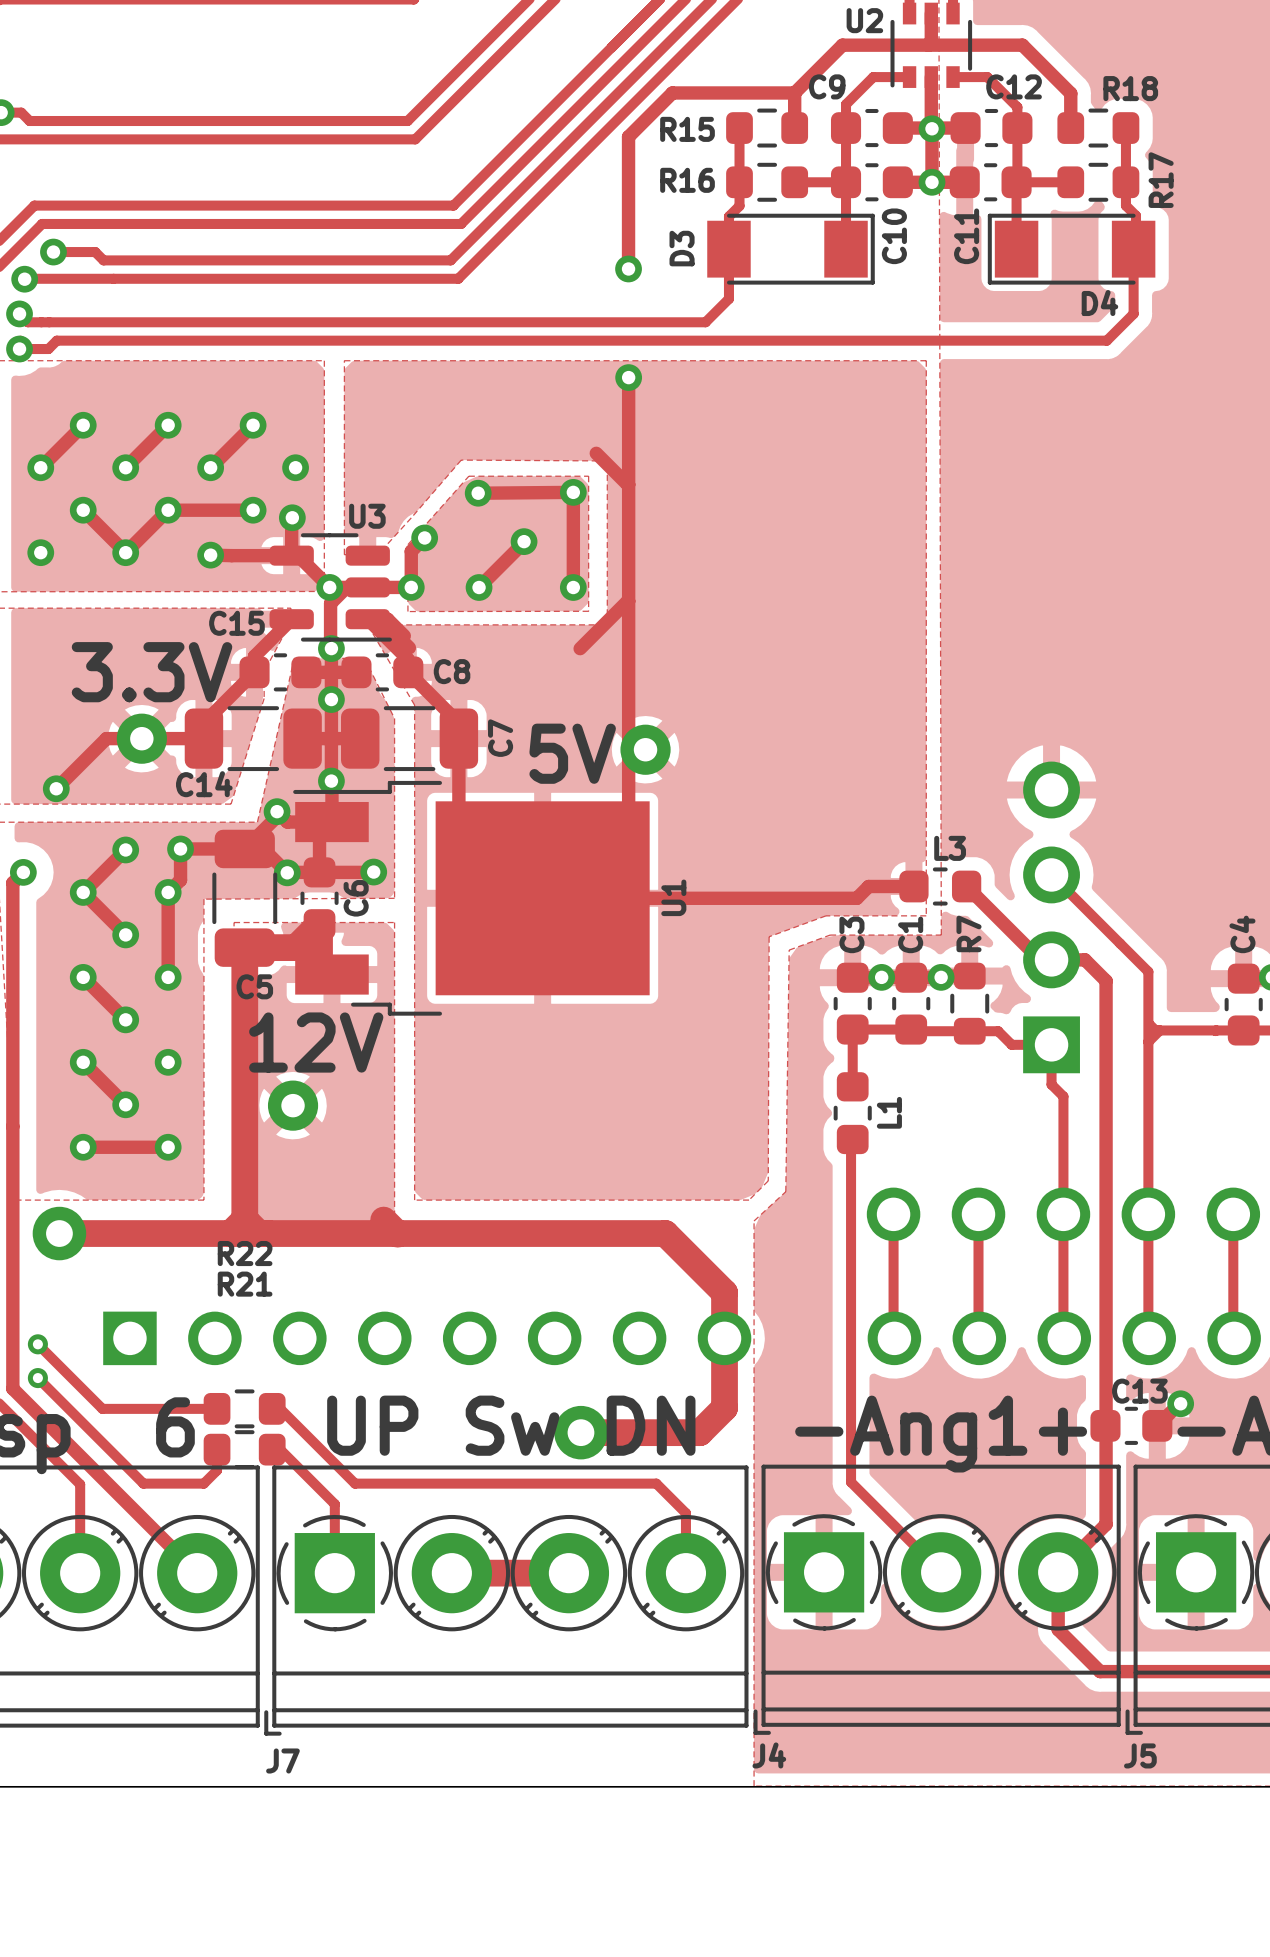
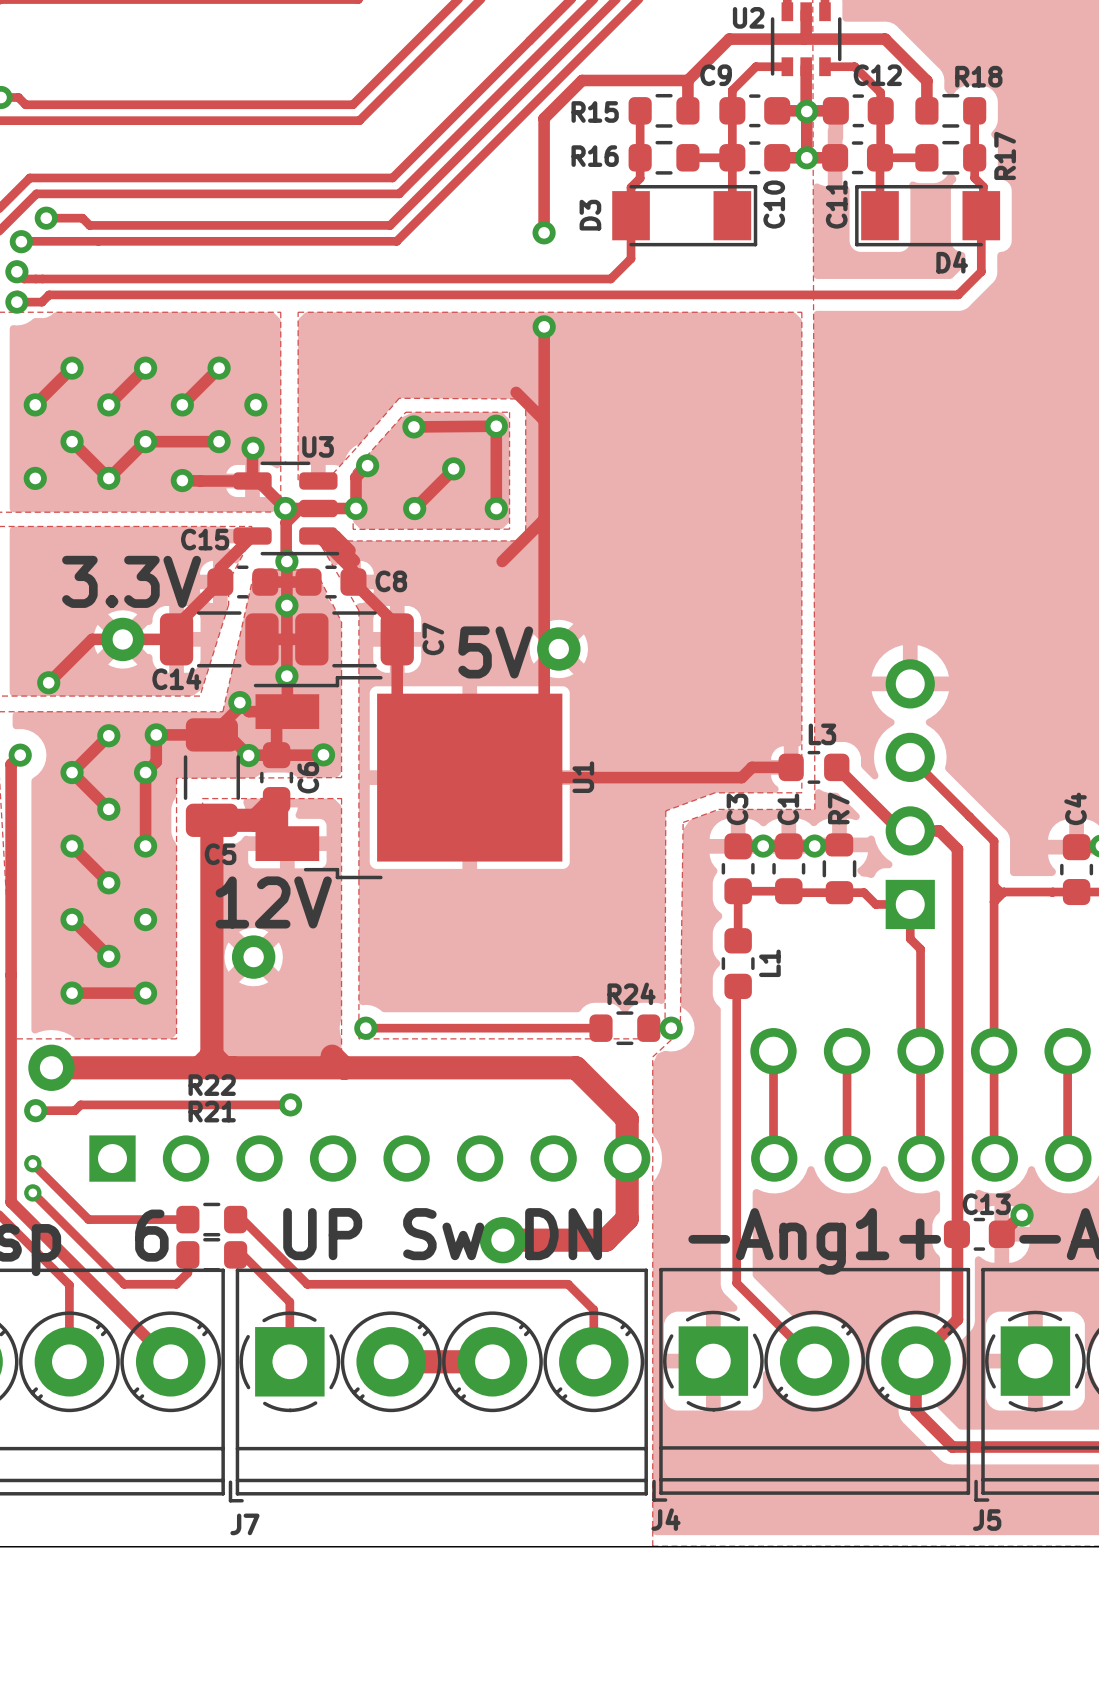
track: none -> (365, 1028) (601, 1028)
via: none -> (365, 1028)
R24: none -> (624, 1028)
via: none -> (671, 1028)
track: none -> (290, 1104) (80, 1104) (74, 1110) (35, 1110)
via: none -> (290, 1104)
via: none -> (35, 1110)

